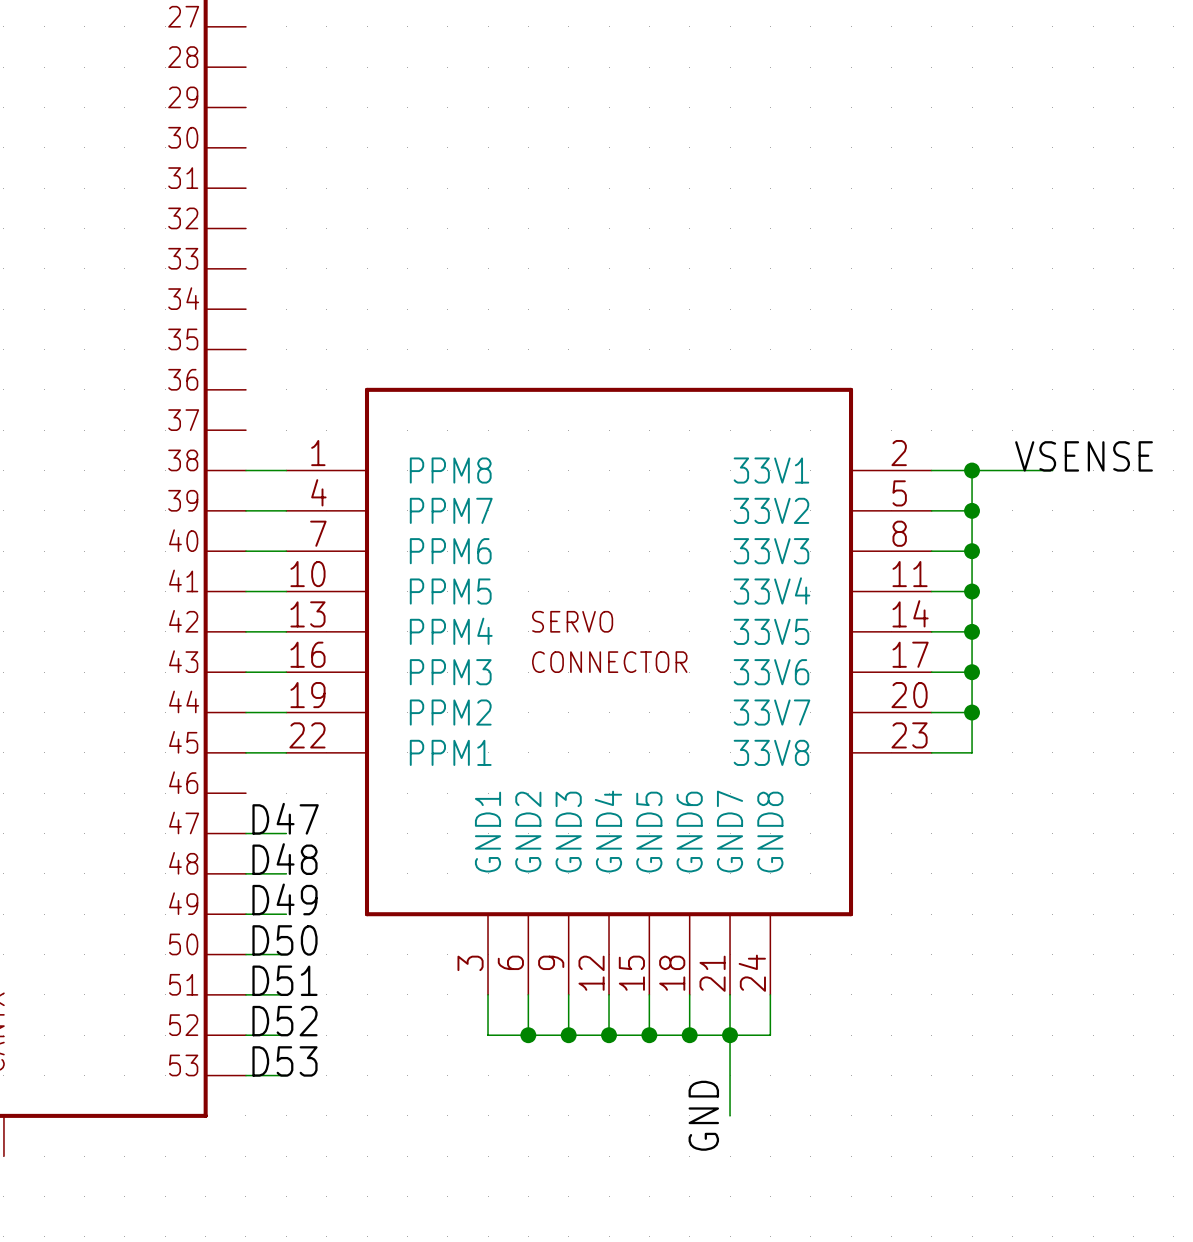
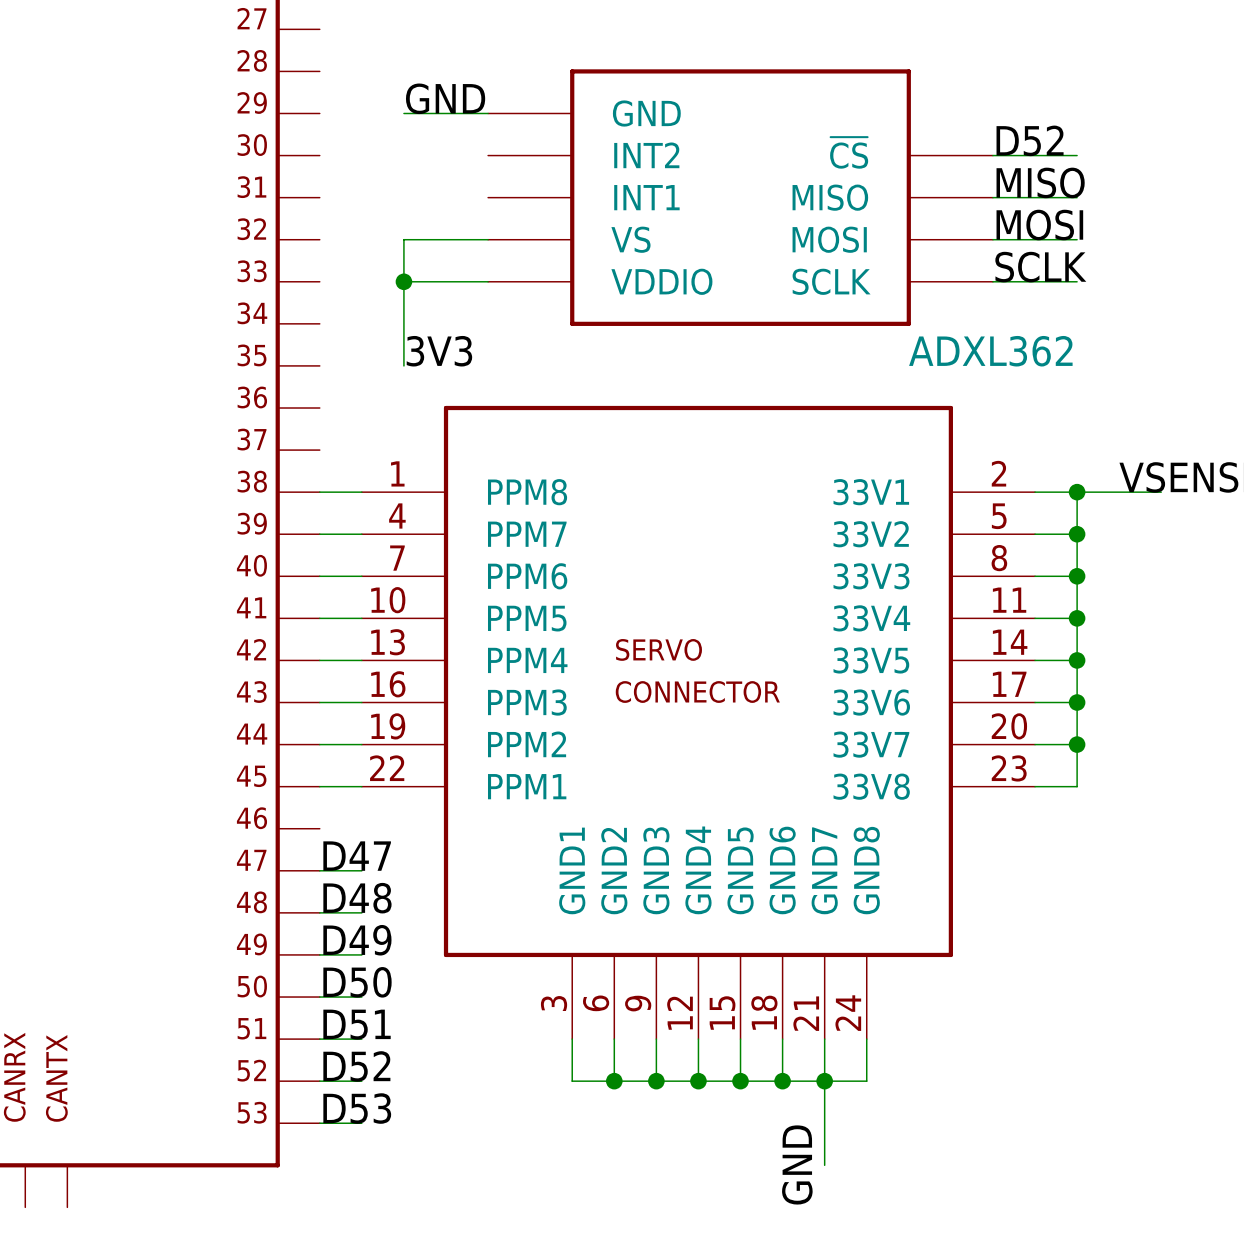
label: none -> GND (445, 98)
wire: none -> (403, 113) (488, 113)
label: none -> D52 (1030, 140)
wire: none -> (992, 155) (1077, 155)
label: none -> MISO (1040, 182)
part: none -> ADXL362 (740, 197)
wire: none -> (992, 197) (1077, 197)
label: none -> MOSI (1039, 225)
wire: none -> (488, 239) (403, 239) (403, 365)
wire: none -> (992, 239) (1077, 239)
label: none -> SCLK (1040, 267)
wire: none -> (403, 281) (488, 281)
junction: none -> (403, 281)
wire: none -> (992, 281) (1077, 281)
label: none -> 3V3 (439, 351)

